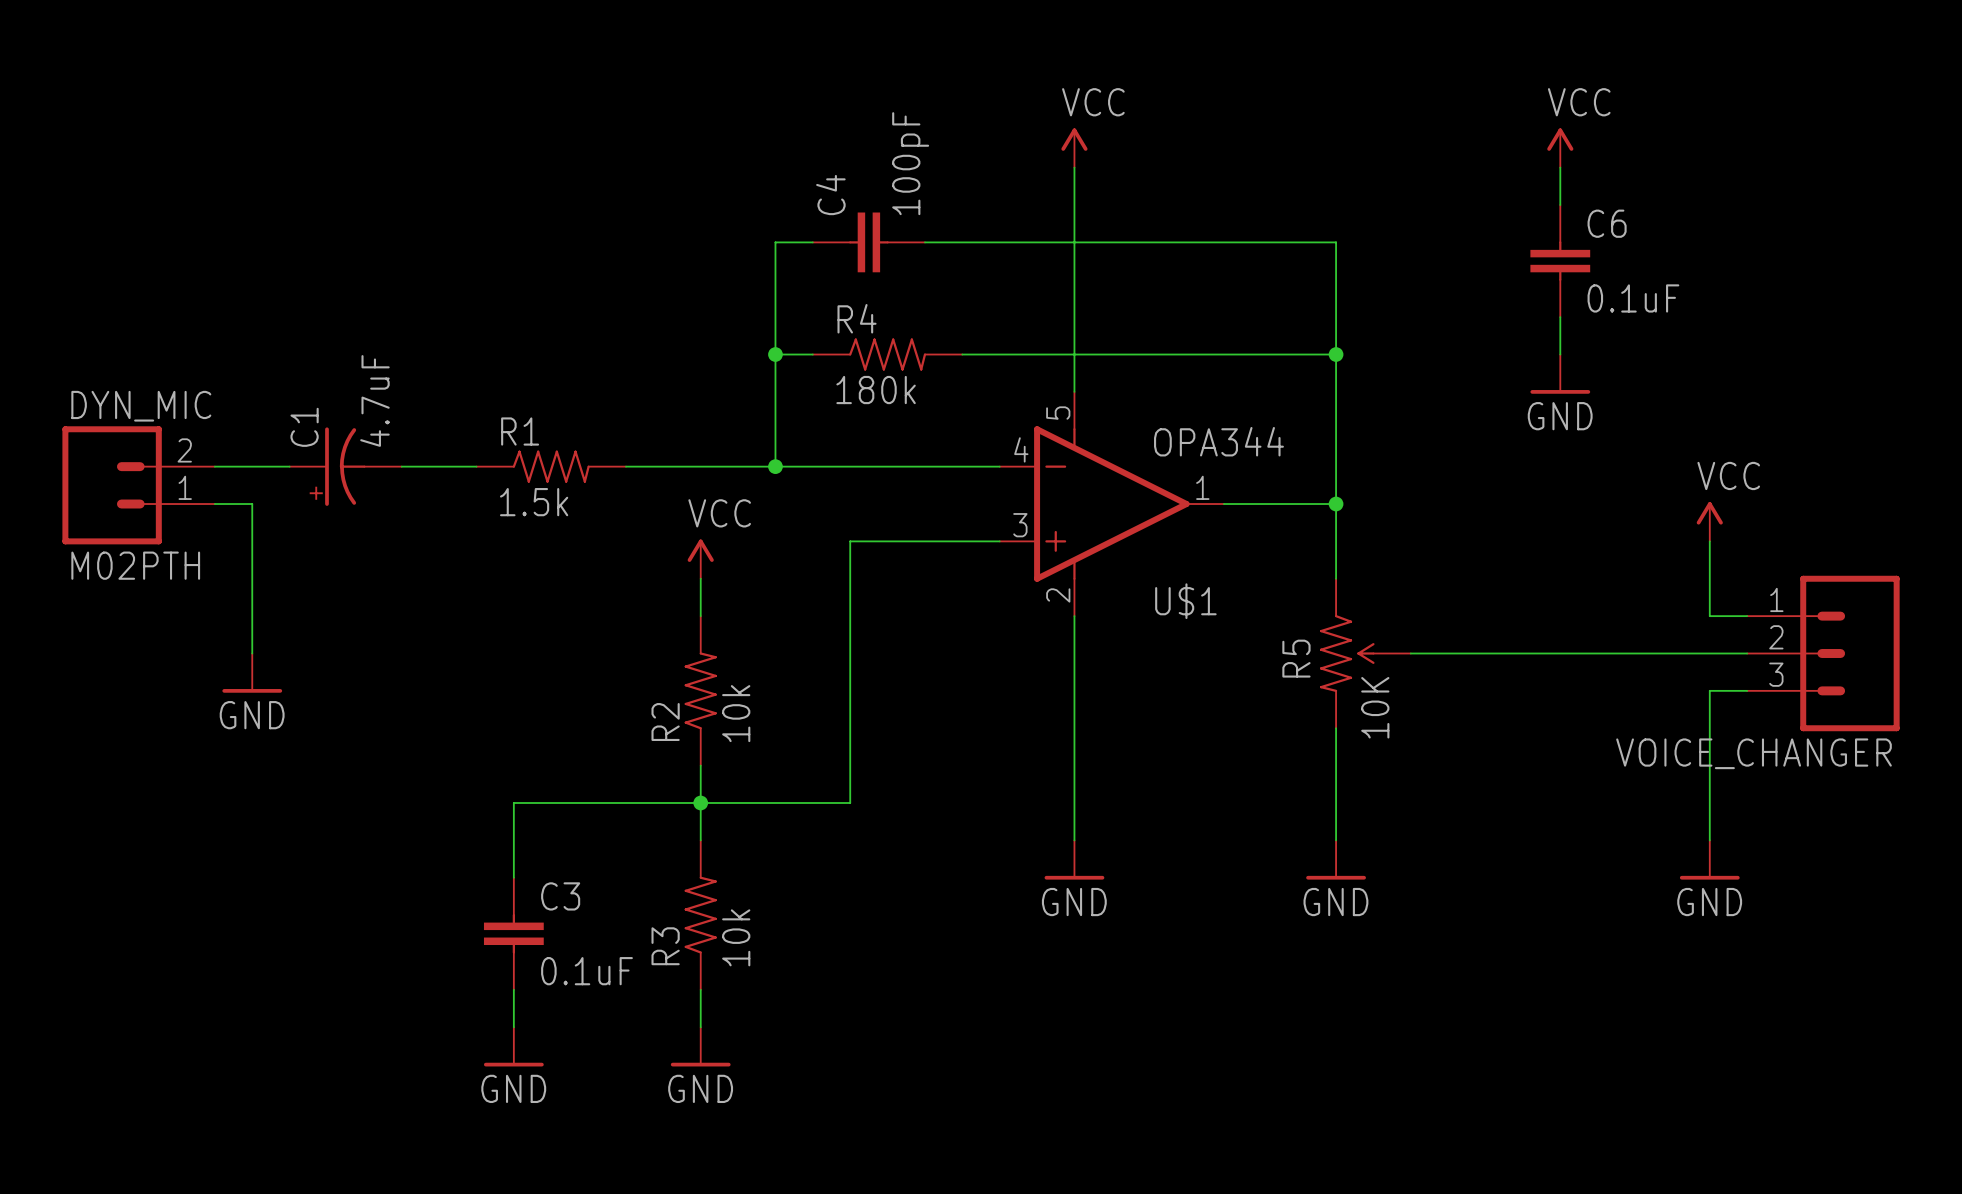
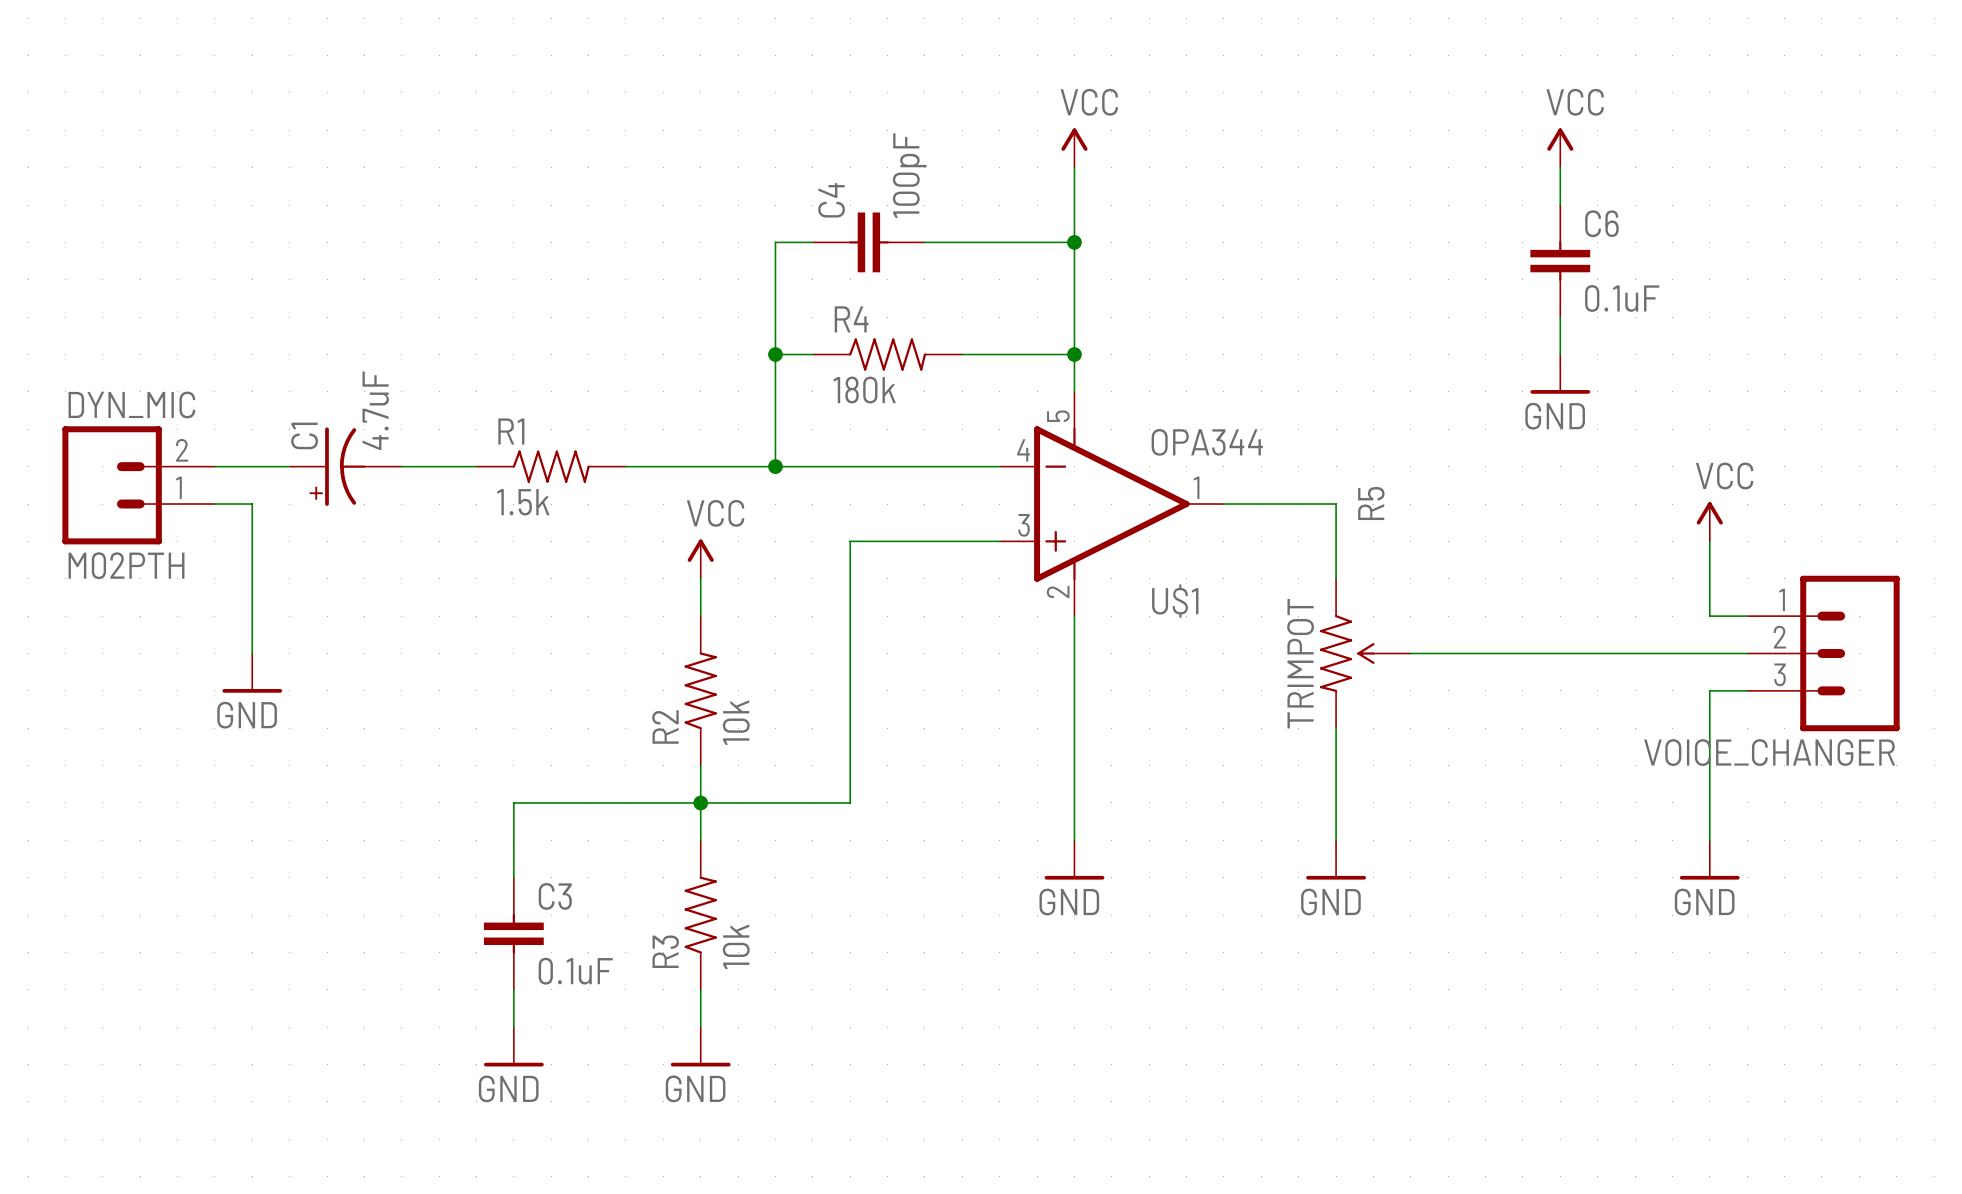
wire: (1074, 242) (1336, 242) (1336, 504) -> none
junction: none -> (1074, 242)
wire: (1074, 354) (1336, 354) -> none
junction: none -> (1074, 354)
junction: (1336, 354) -> none
junction: (1336, 504) -> none
R5 name position: R5 (1296, 658) -> R5 (1371, 503)
R5 value: 10K (1375, 707) -> TRIMPOT (1300, 663)

